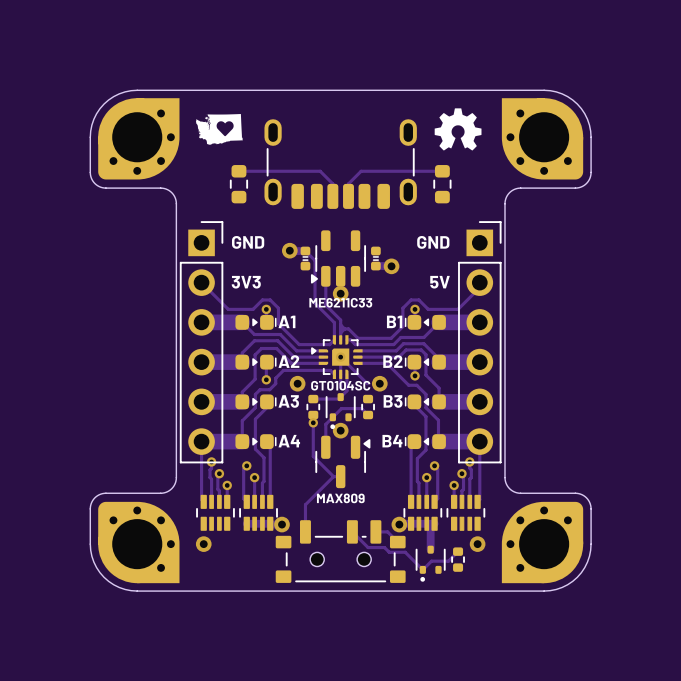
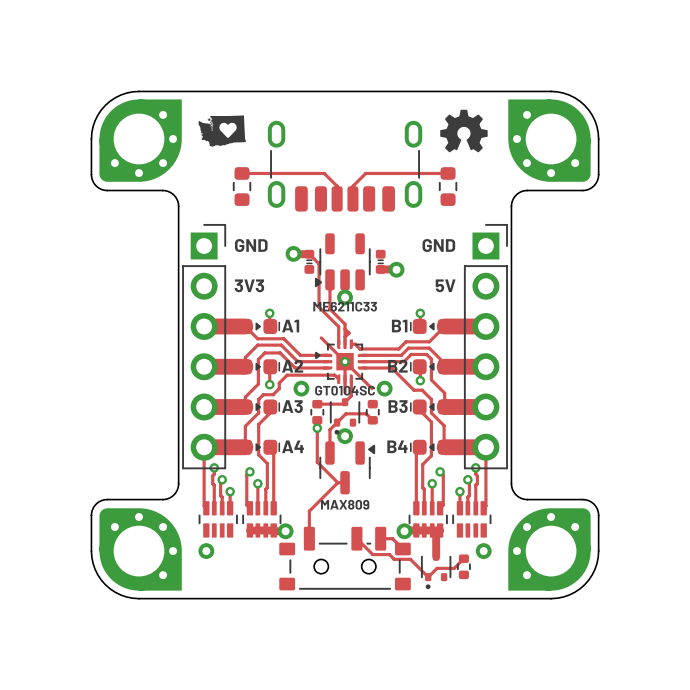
track: (201, 282) (228, 309) (253, 309) (262, 299) (270, 299) (278, 308) (278, 323) (299, 344) (329, 344) (334, 339) -> none
track: (479, 282) (479, 287) (458, 309) (428, 309) (418, 299) (411, 299) (402, 308) (402, 326) (391, 338) (357, 338) (348, 328) (340, 328) -> none
track: none -> (321, 337) (345, 361)

